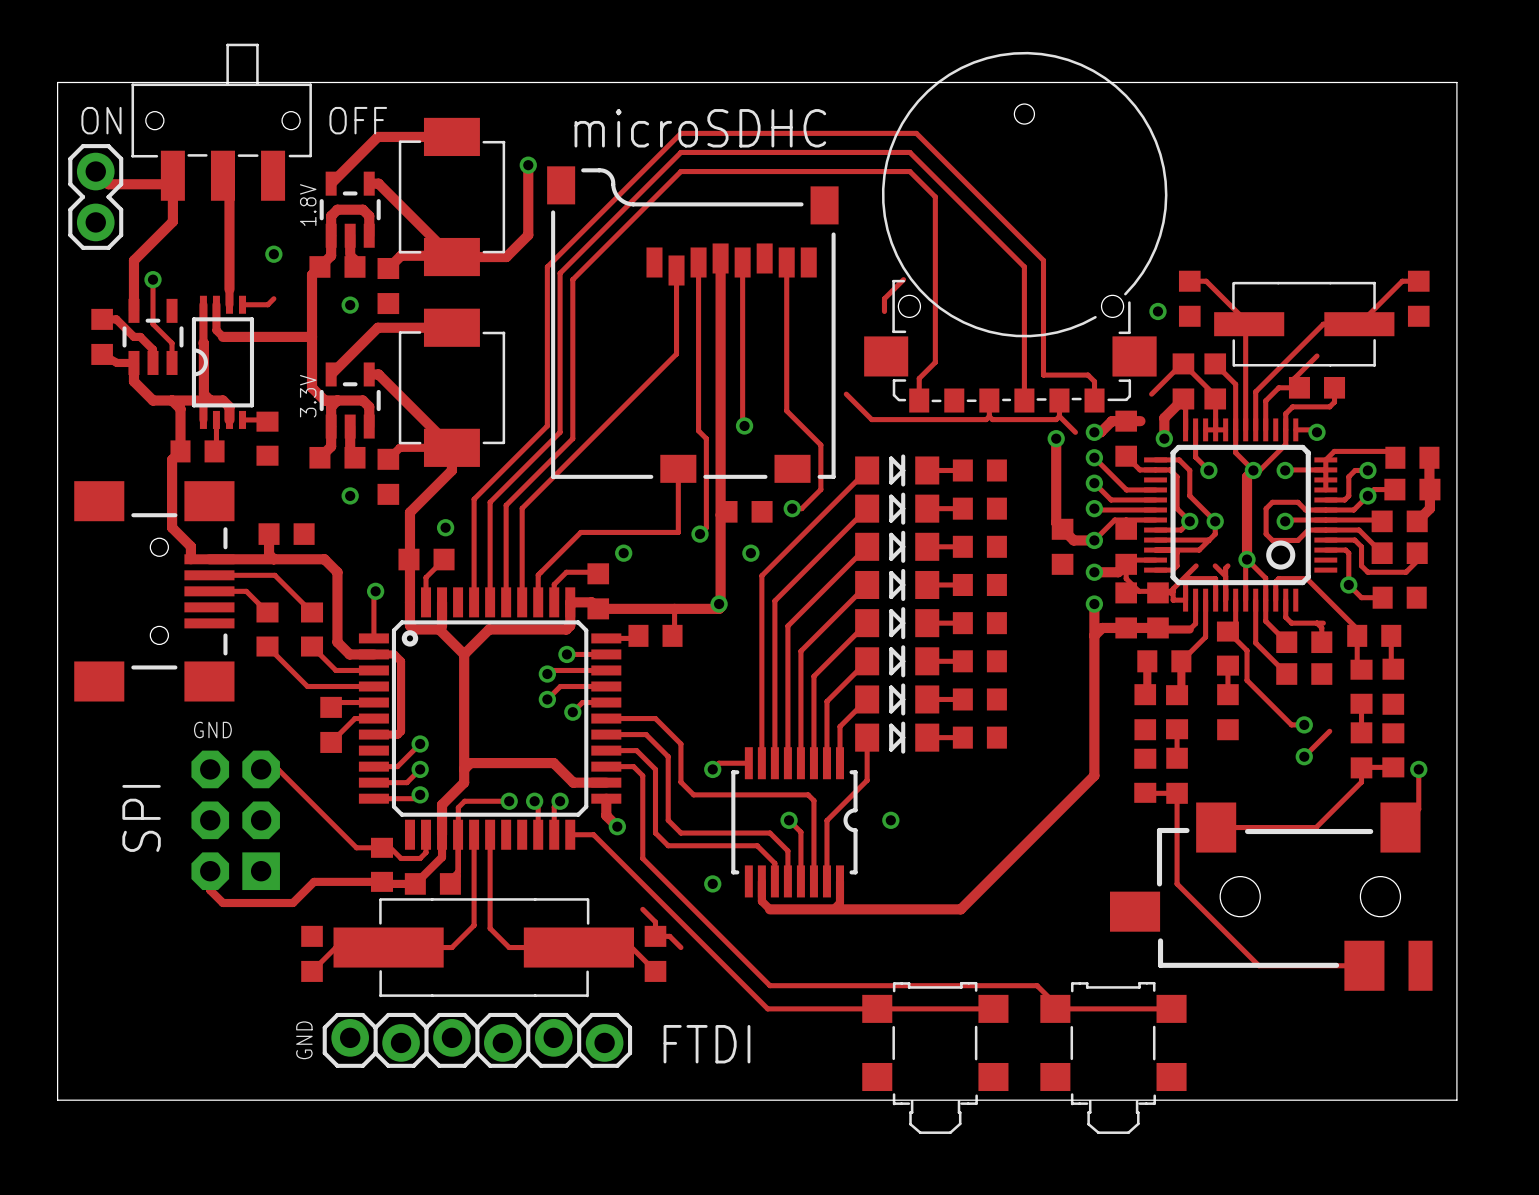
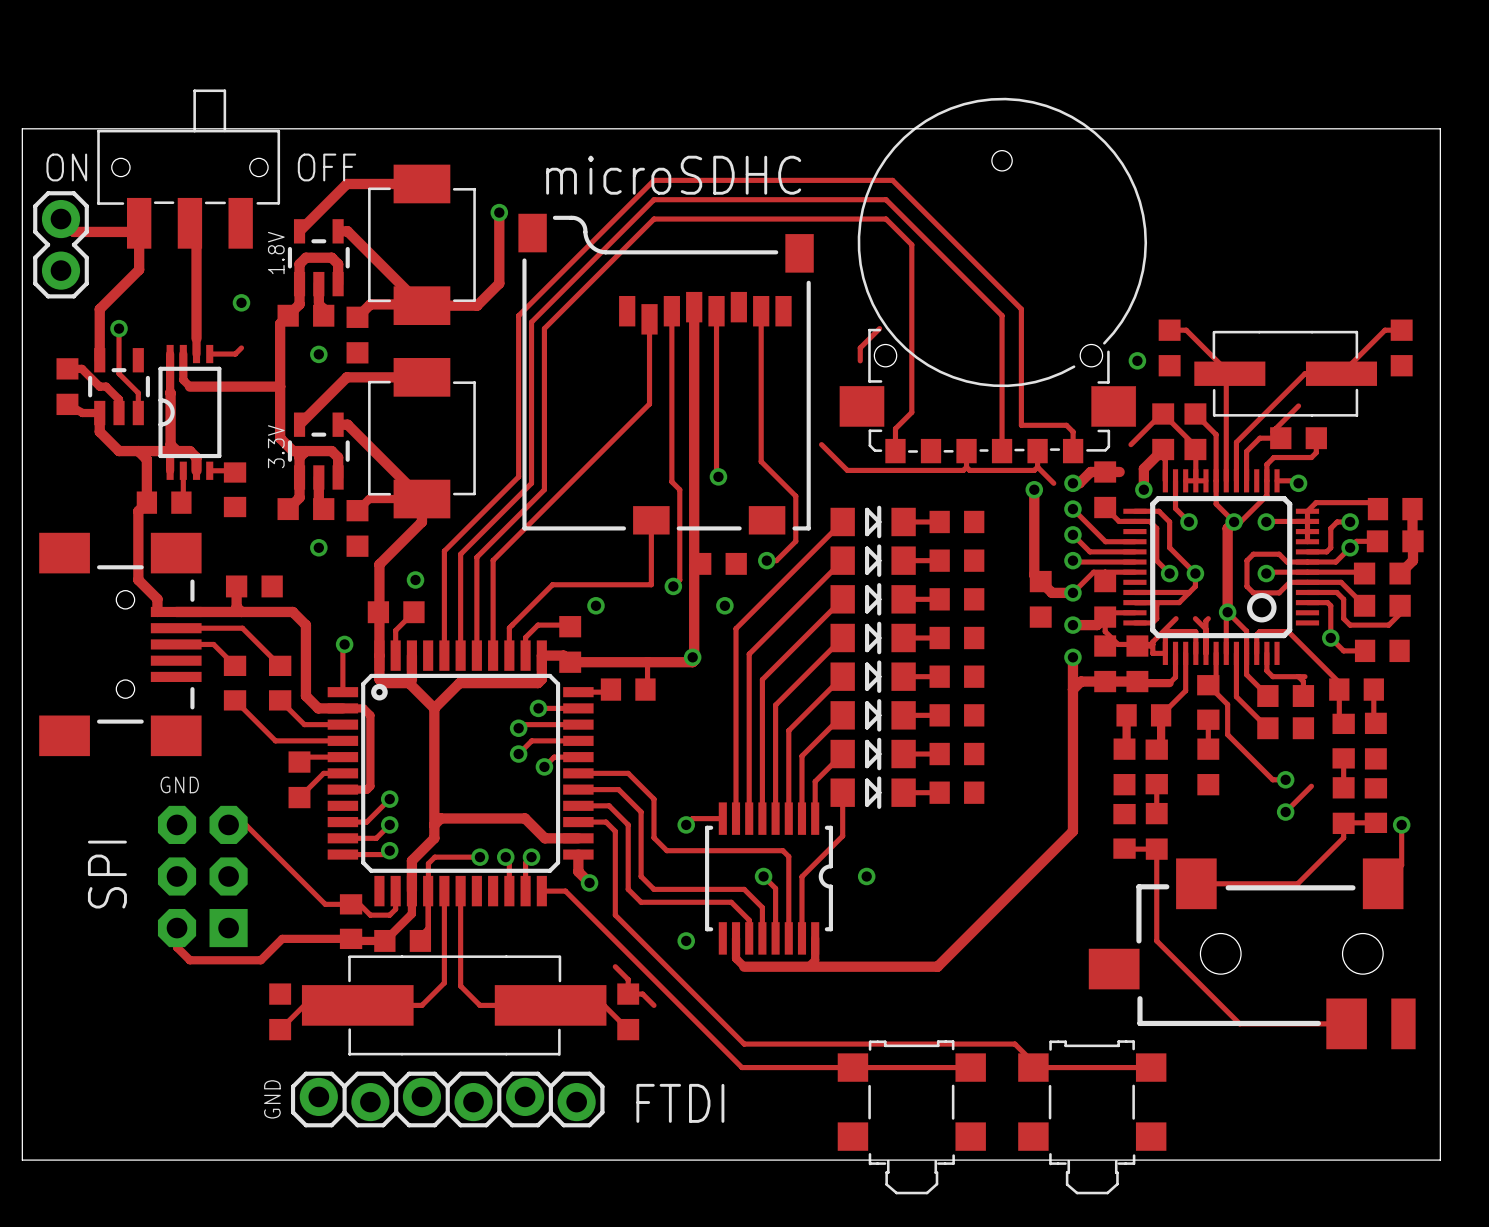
track: (1189, 521) (1181, 530) (1155, 530) -> none

